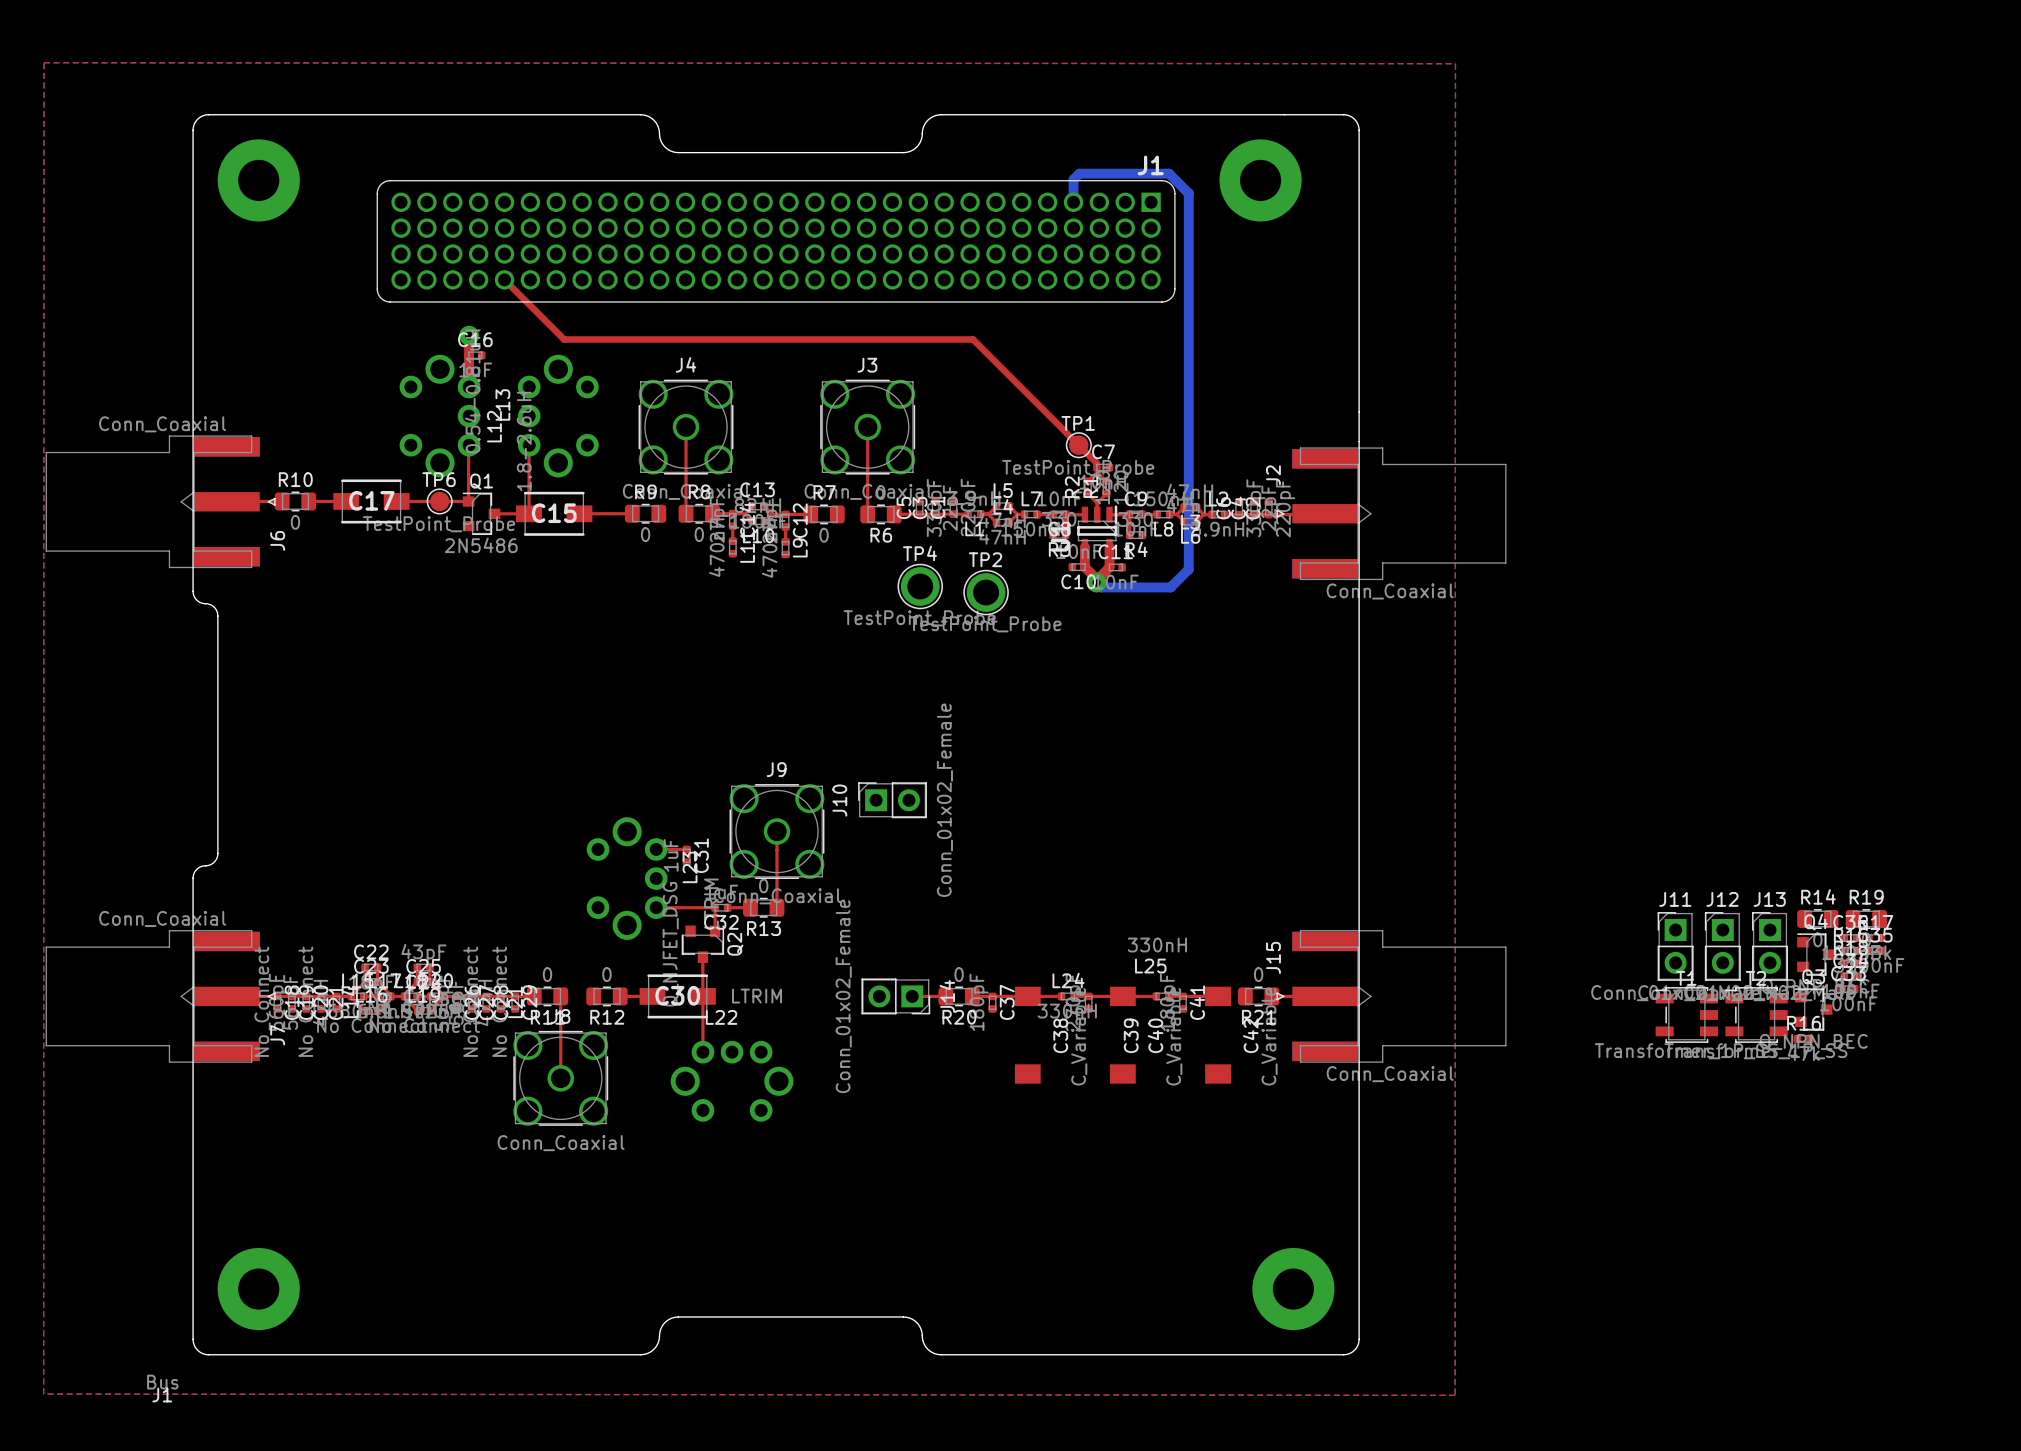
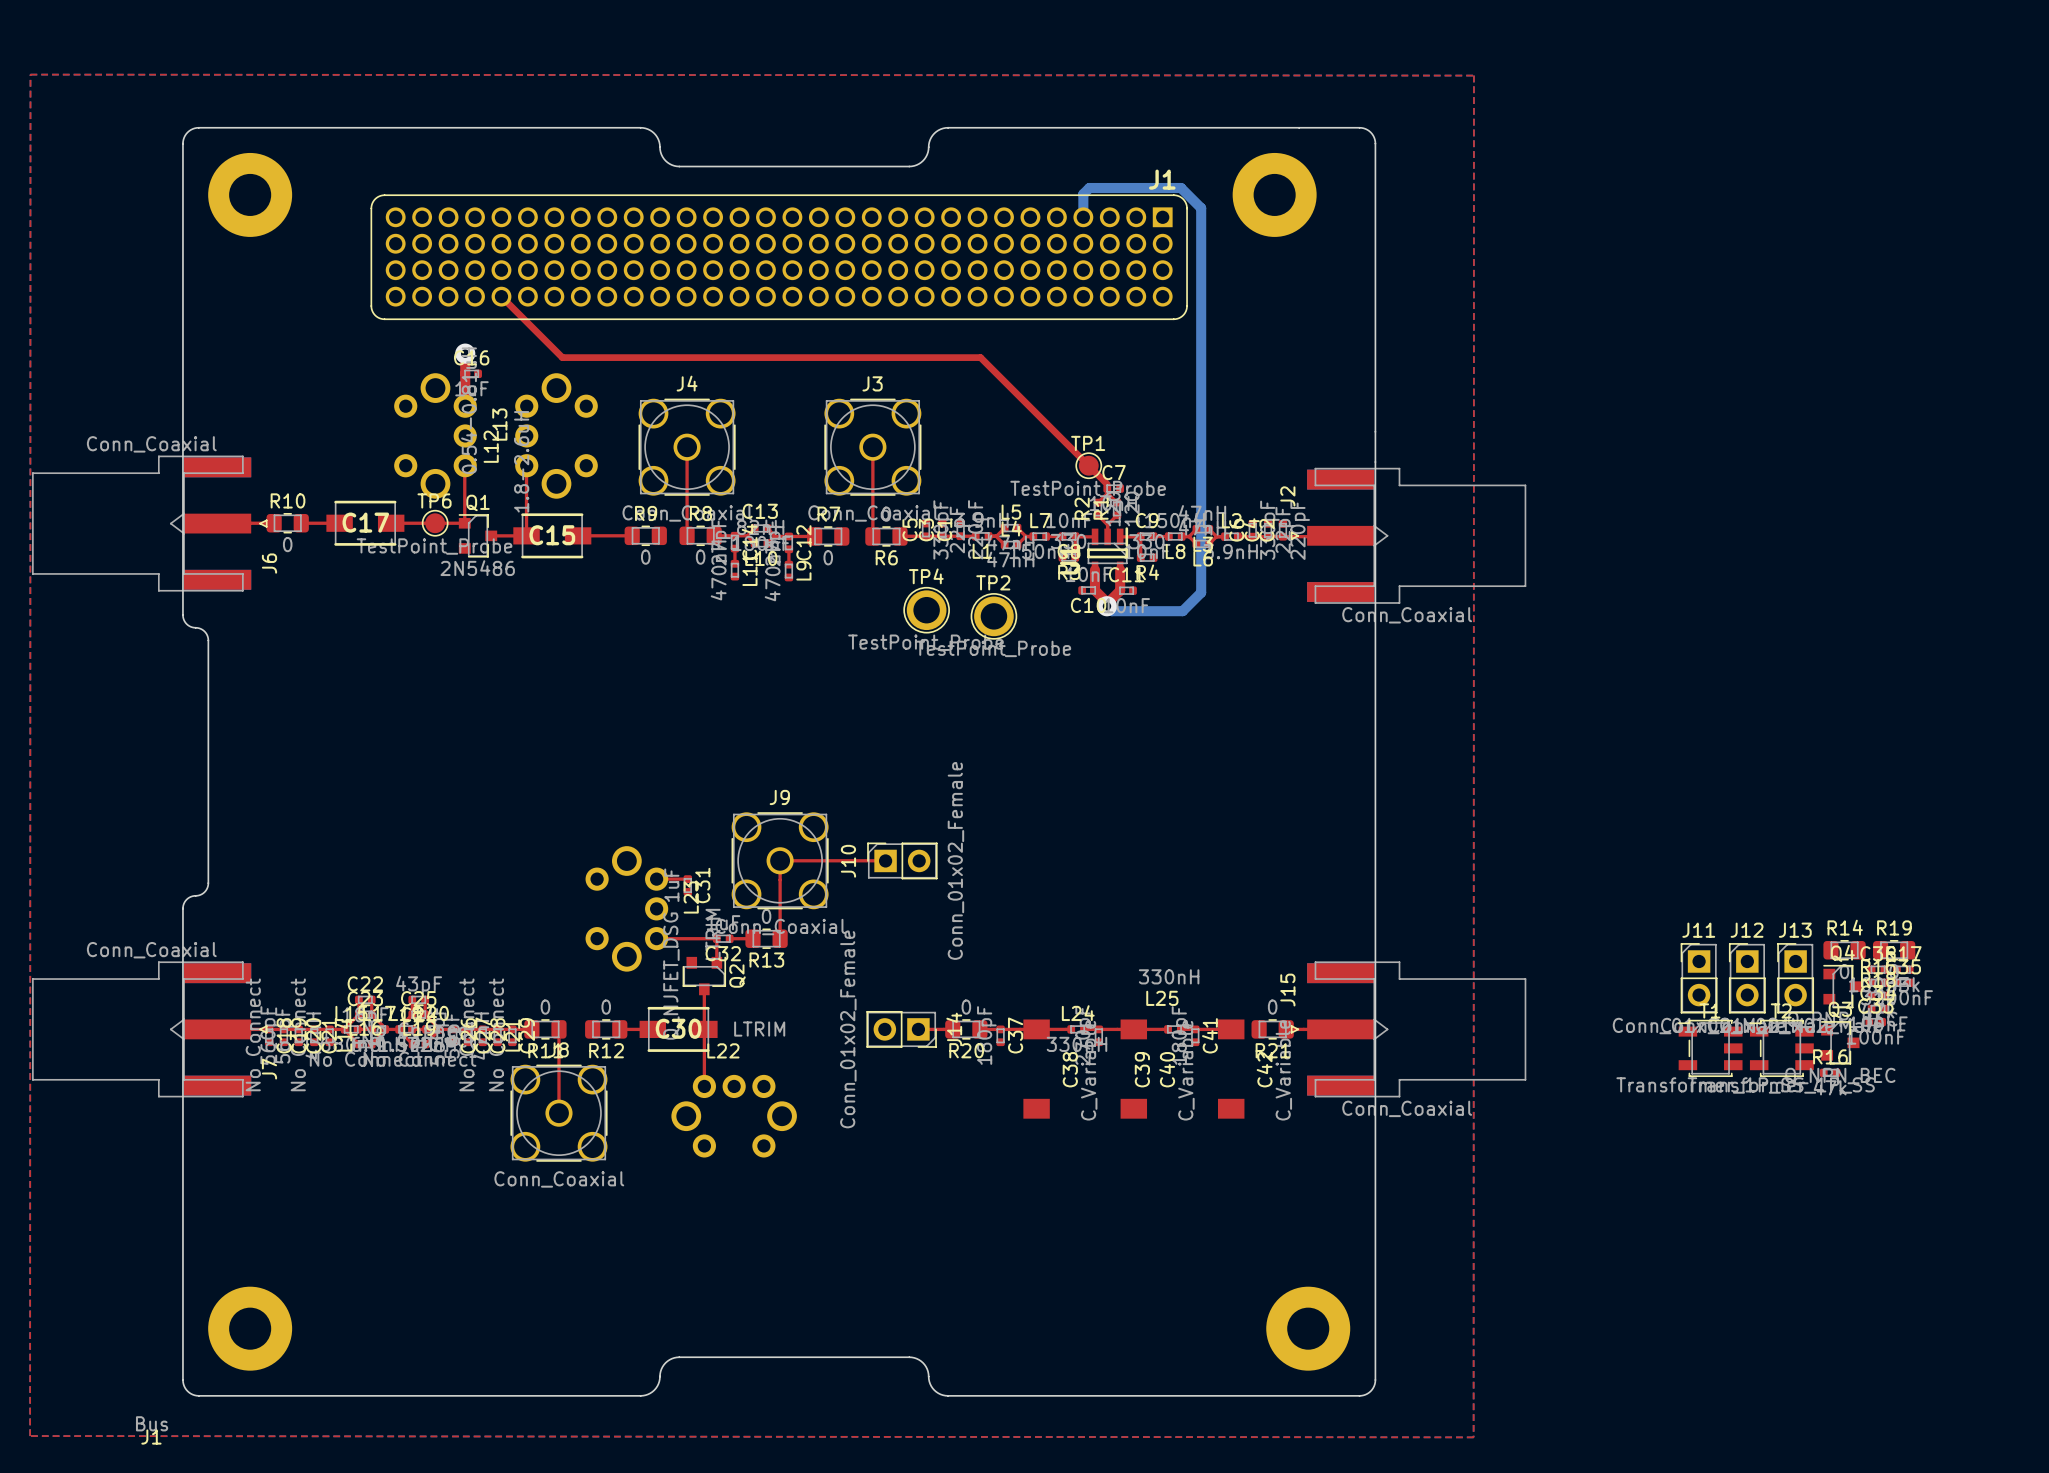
J10 position: (892, 800) -> (902, 860)
top track: none -> (780, 860) (885, 860)

